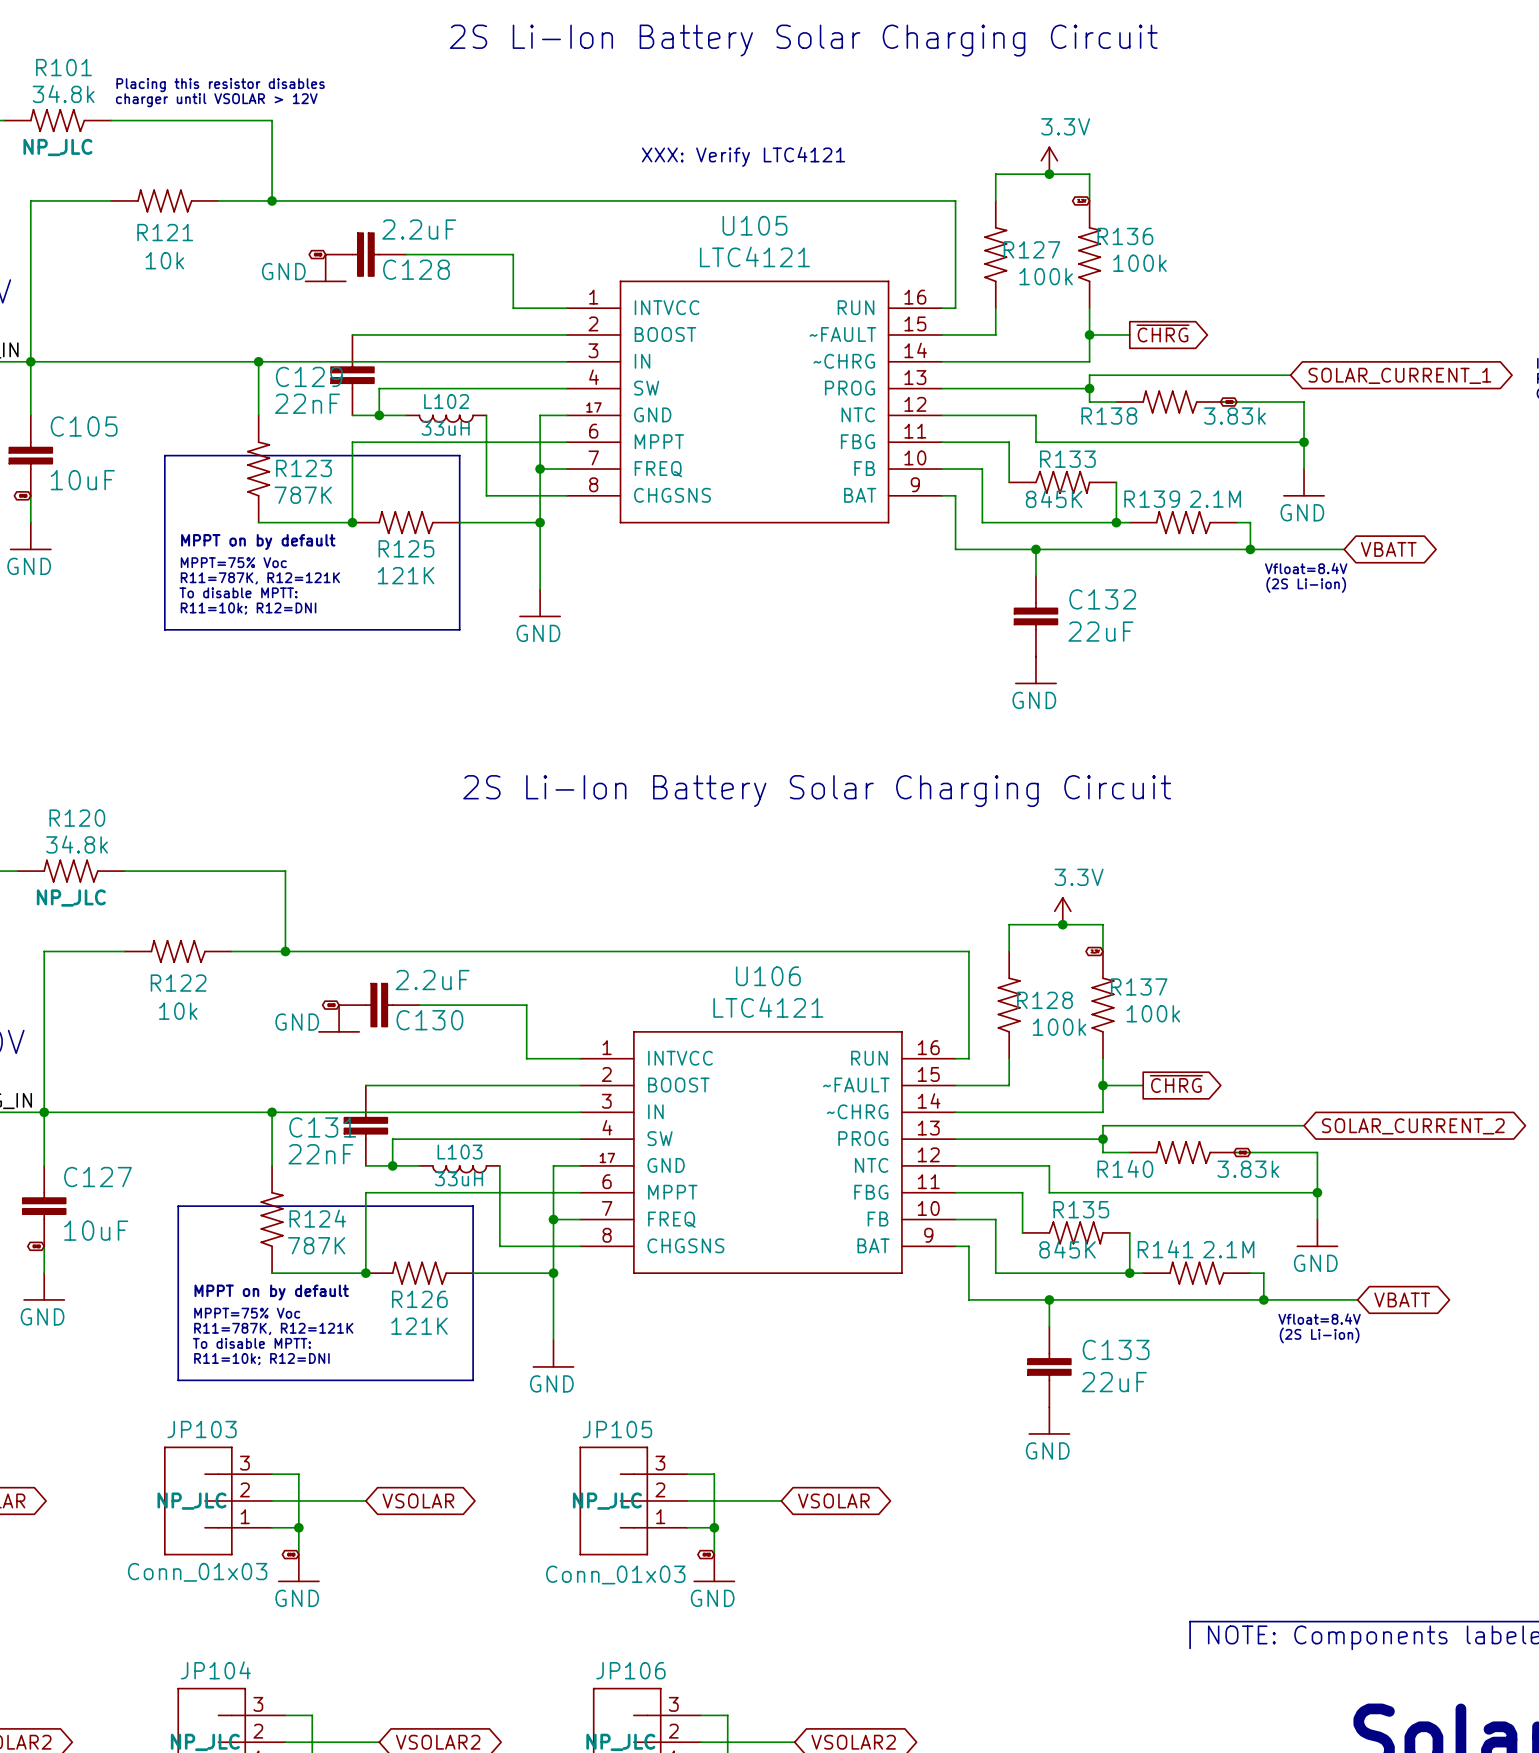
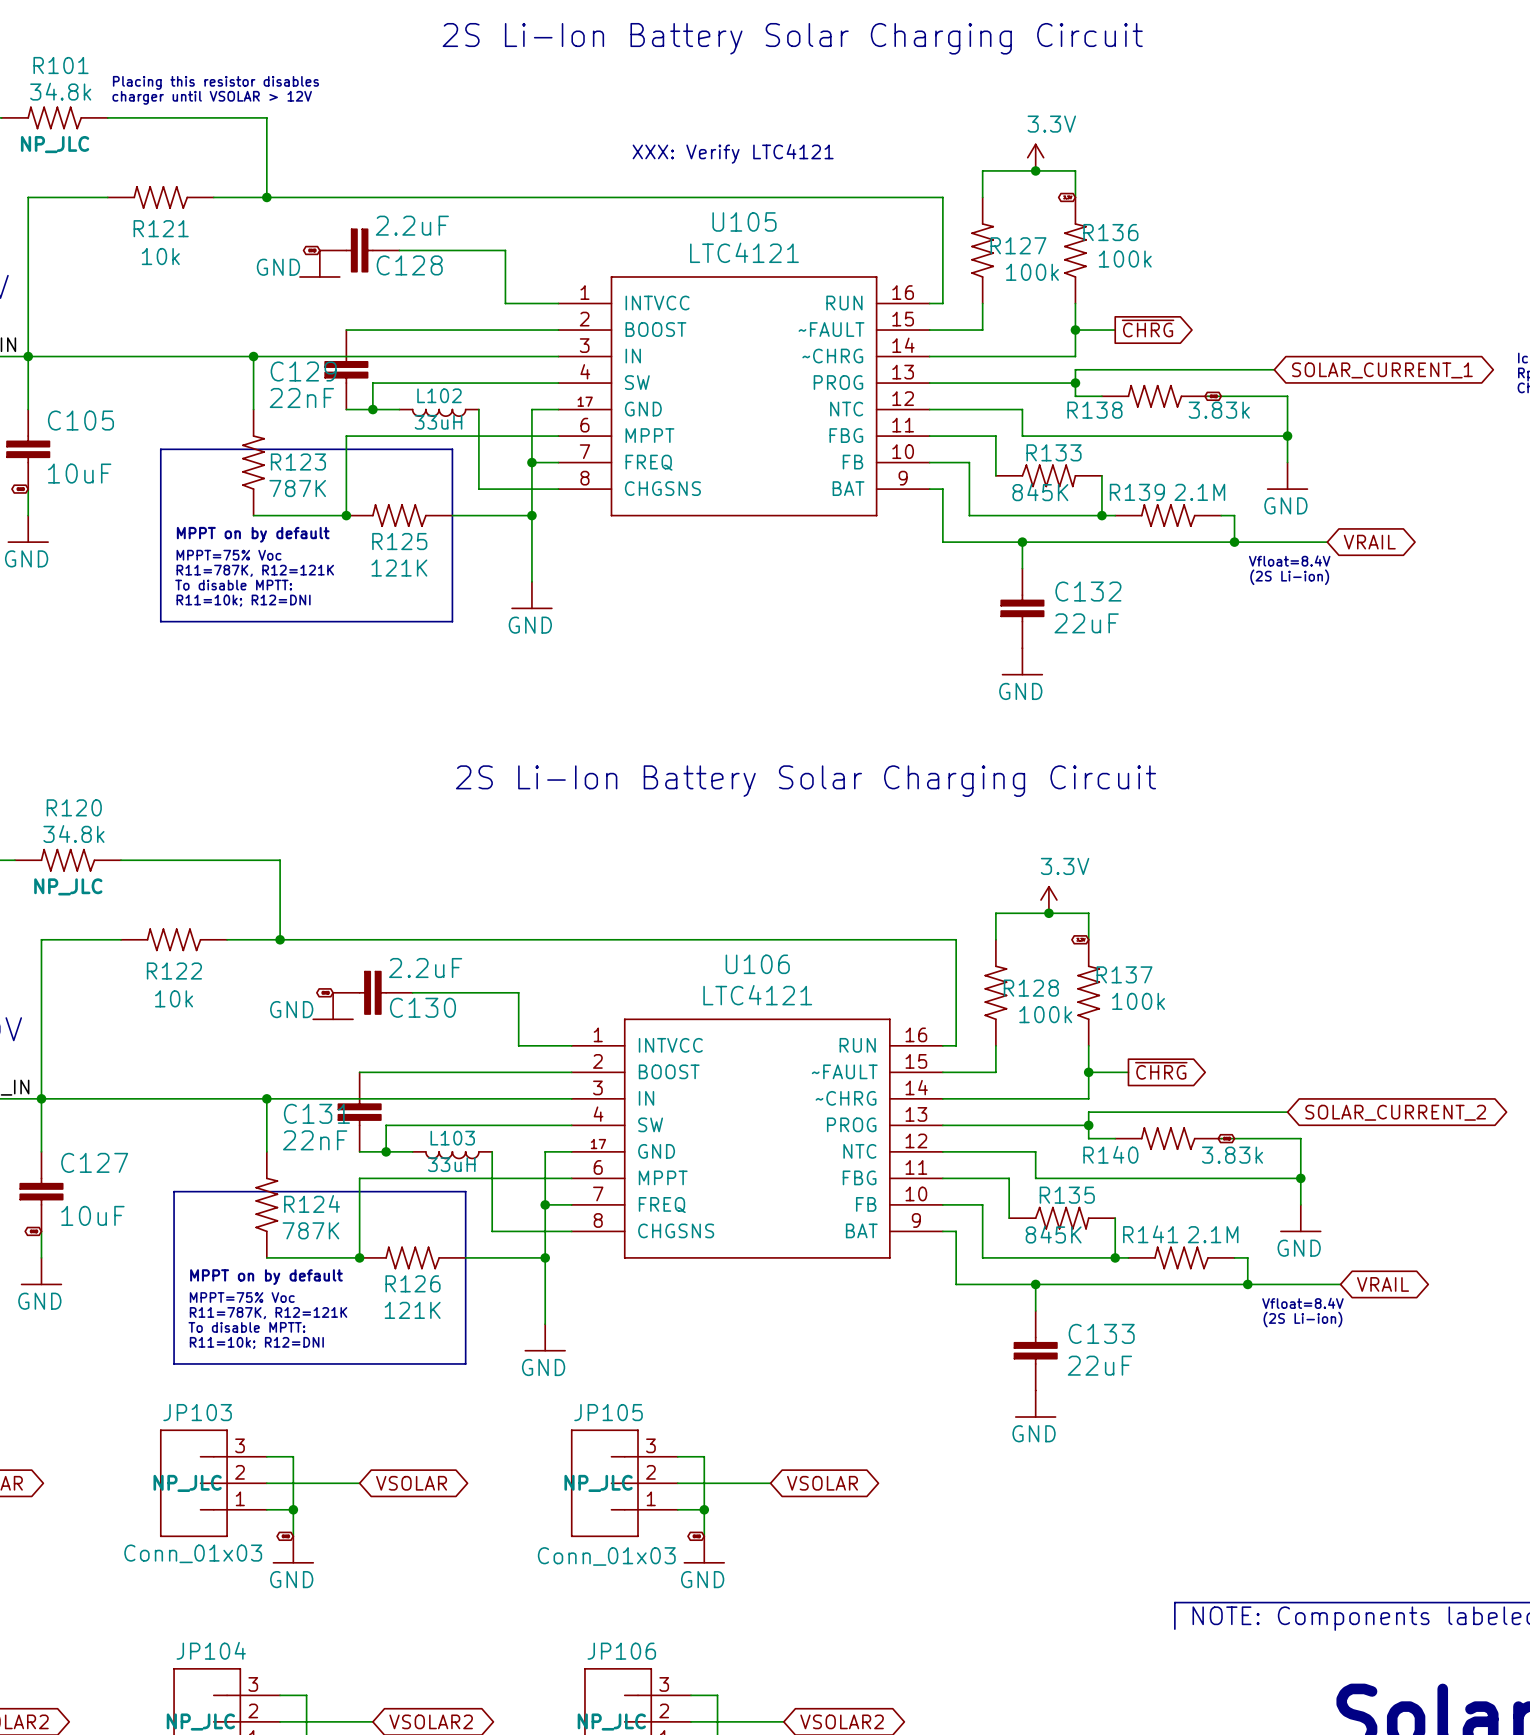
global label: VBATT (1388, 549) -> VRAIL (1369, 542)
global label: VBATT (1402, 1299) -> VRAIL (1383, 1284)

